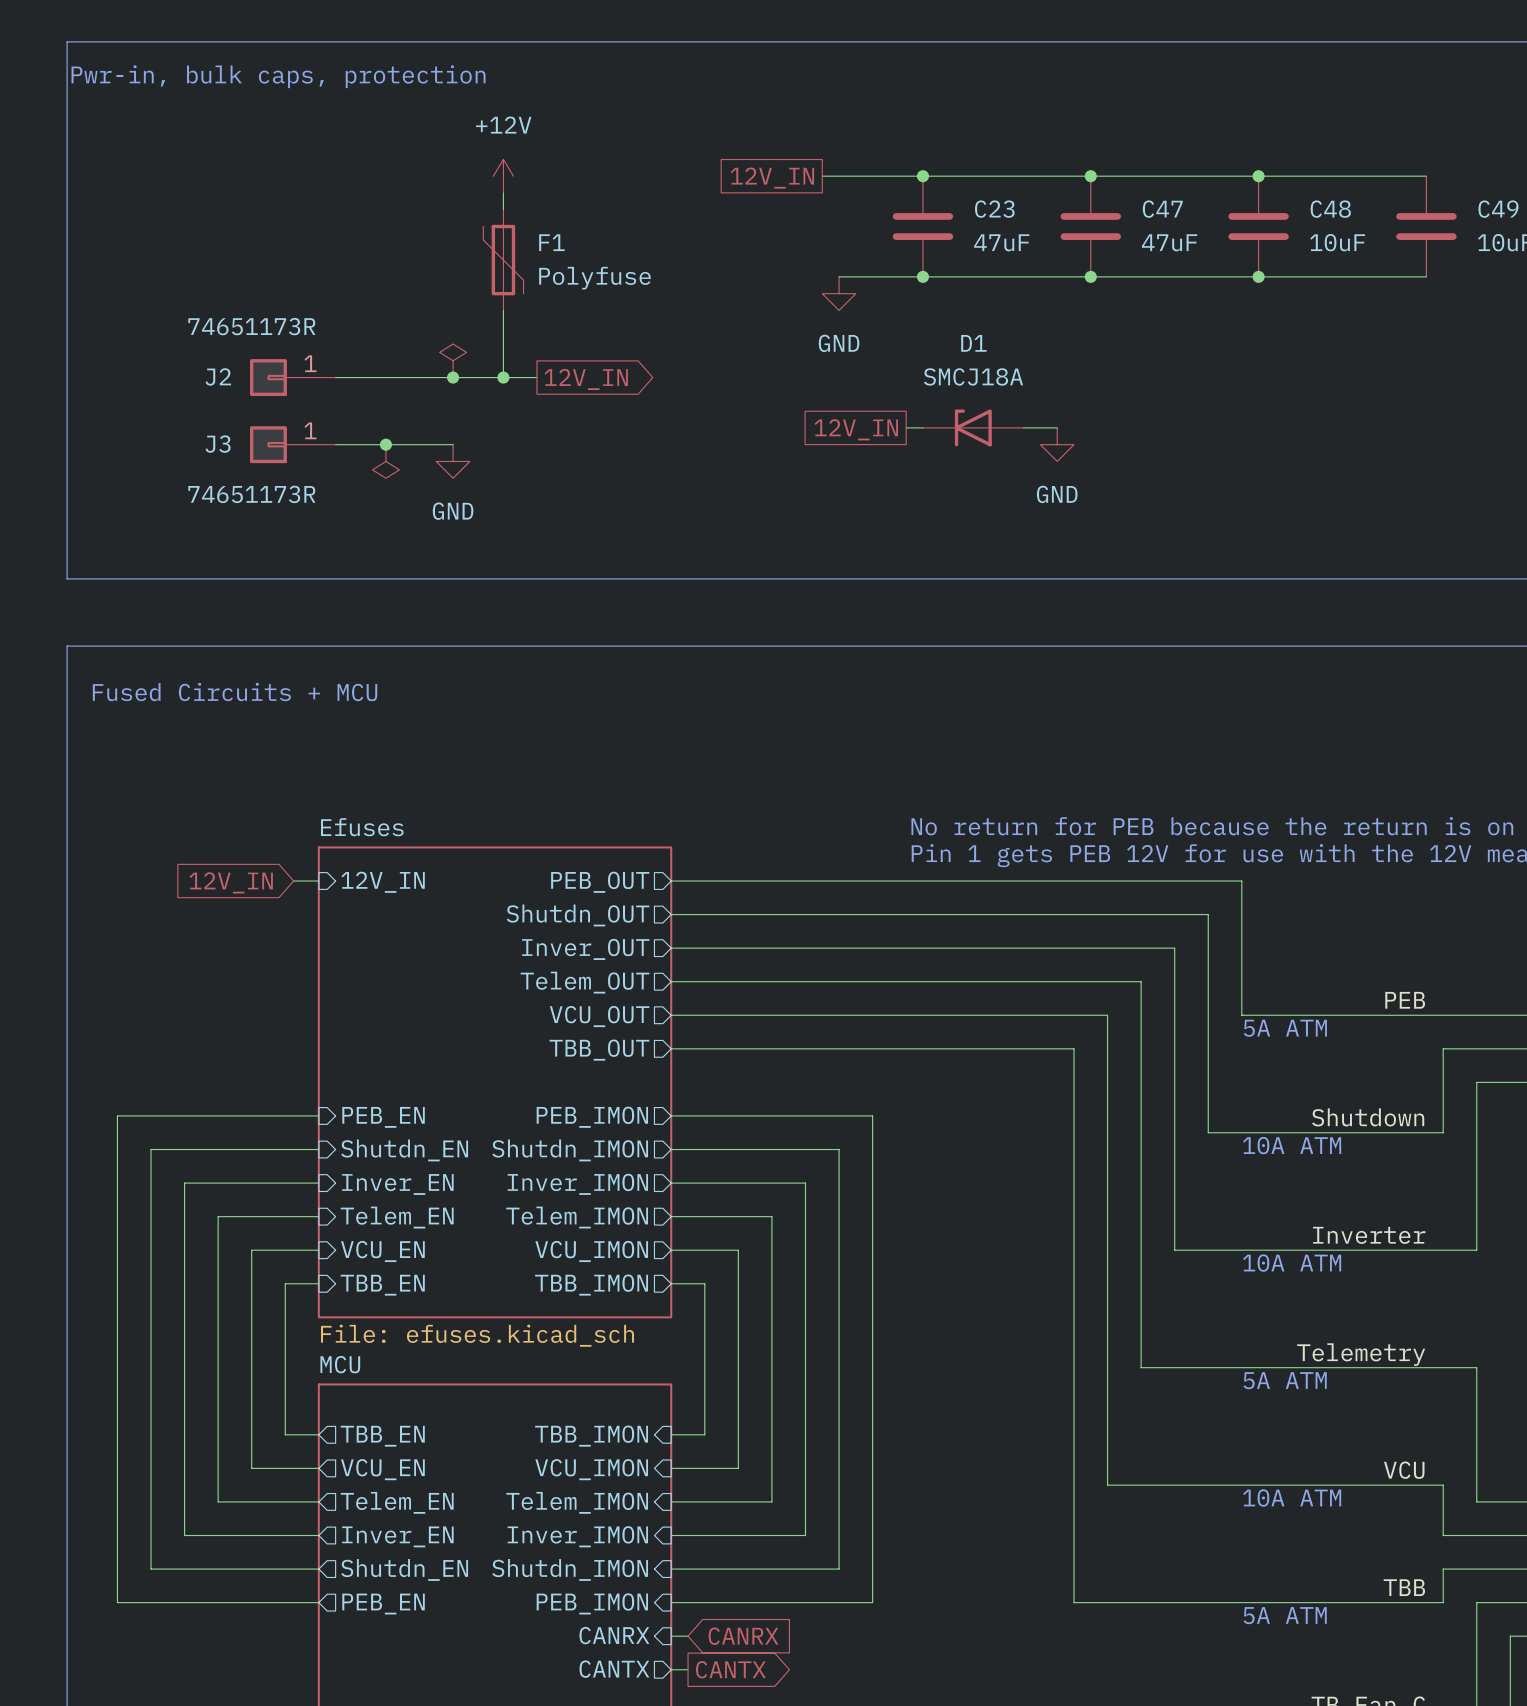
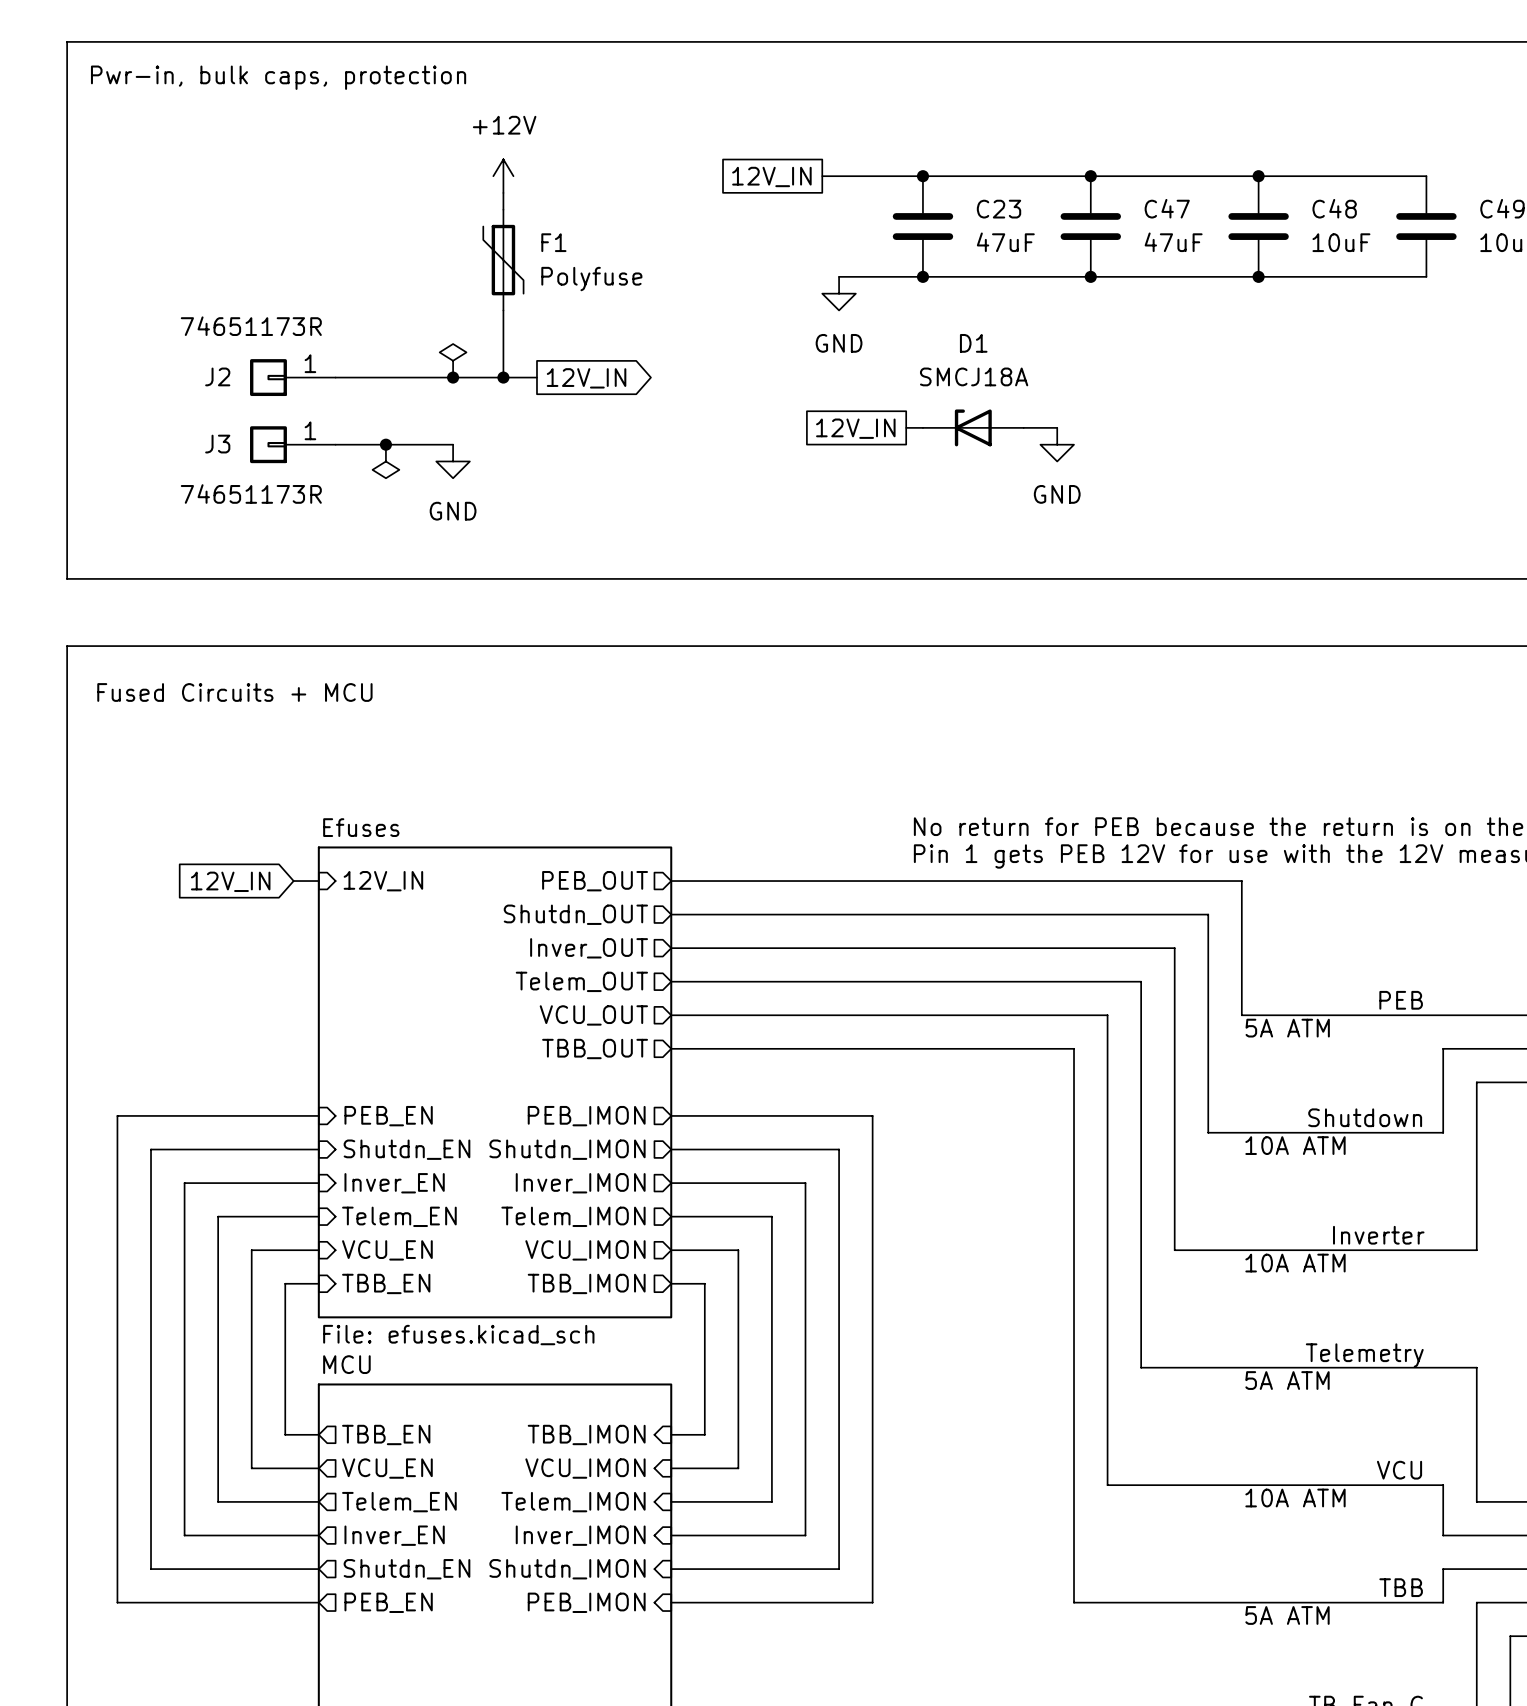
sheet pin: CANRX (614, 1635) -> none
wire: (671, 1636) (688, 1636) -> none
global label: CANRX (743, 1636) -> none
sheet pin: CANTX (614, 1669) -> none
wire: (671, 1669) (688, 1669) -> none
global label: CANTX (730, 1669) -> none

